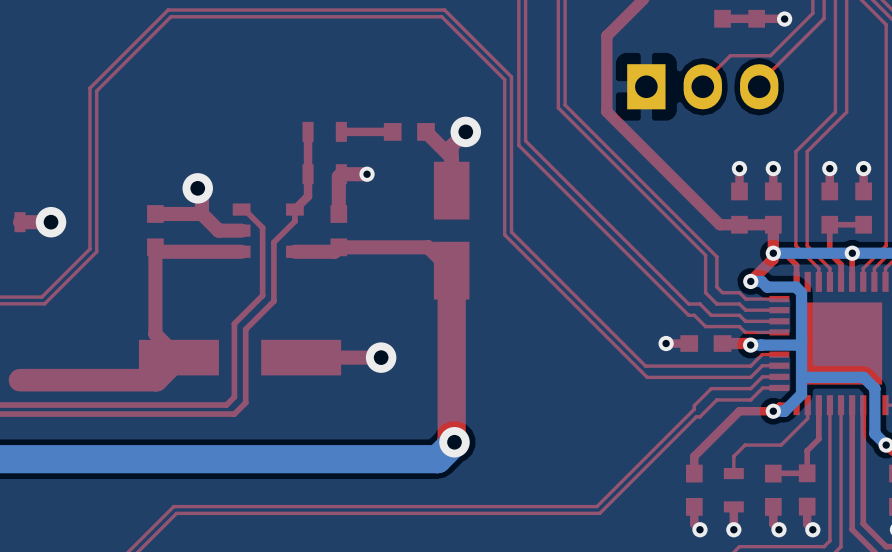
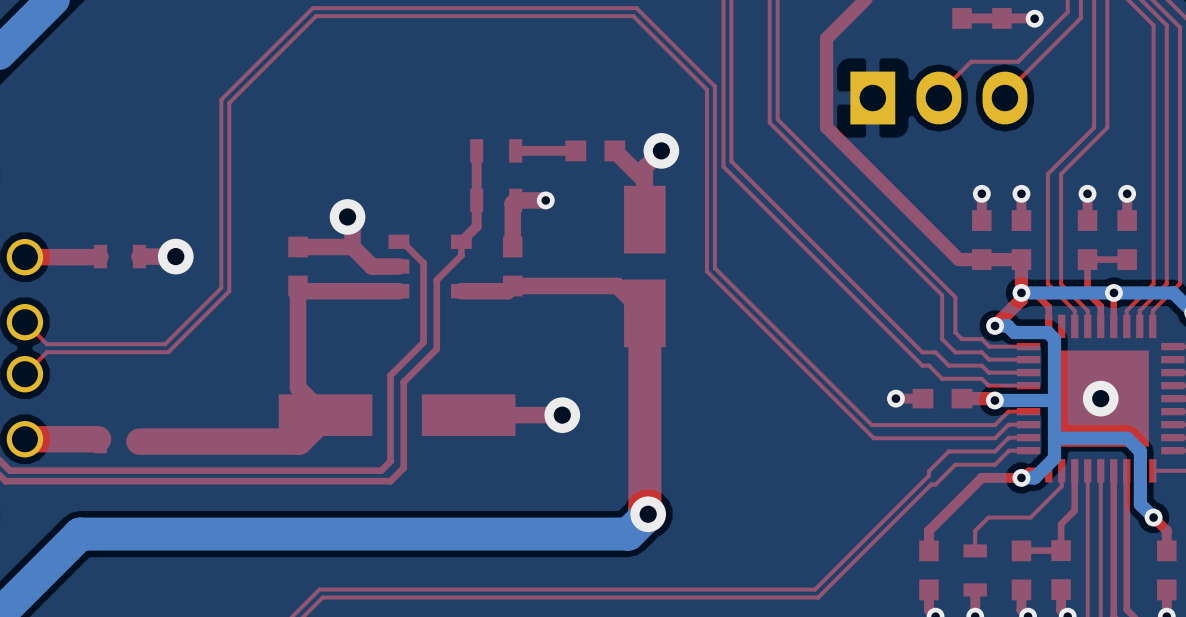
via: none -> (1100, 398)

